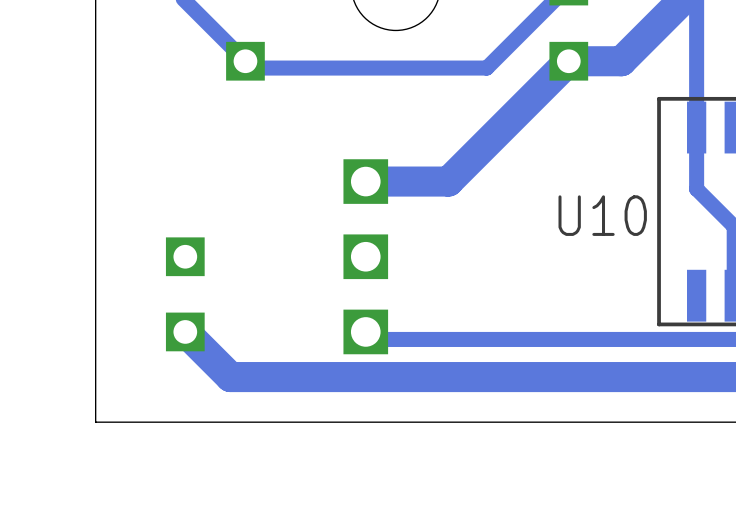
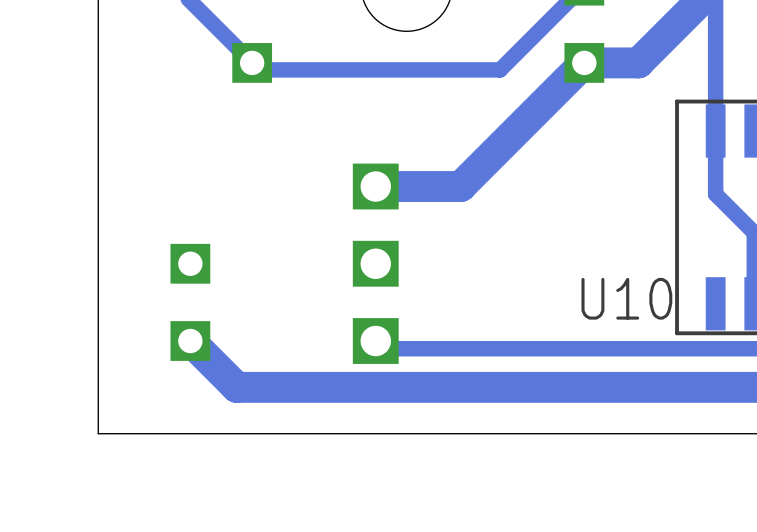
U10 name position: U10 (602, 215) -> U10 (626, 298)

